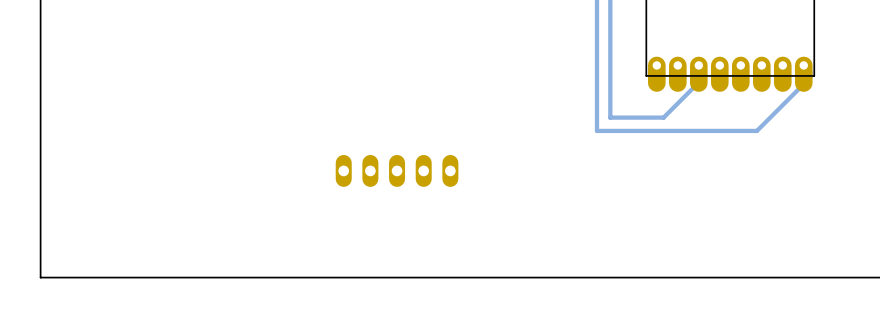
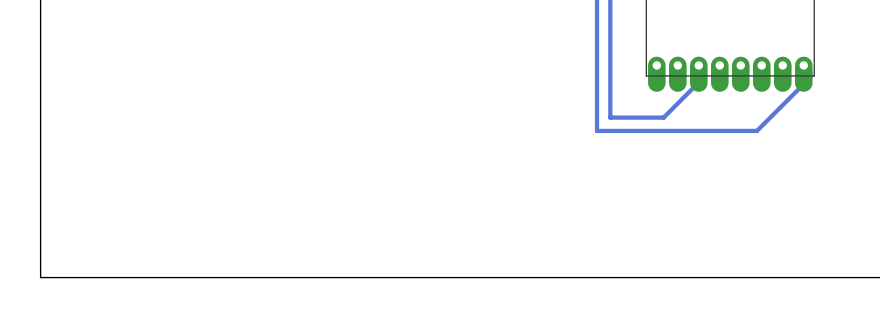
part: (397, 170) -> none

